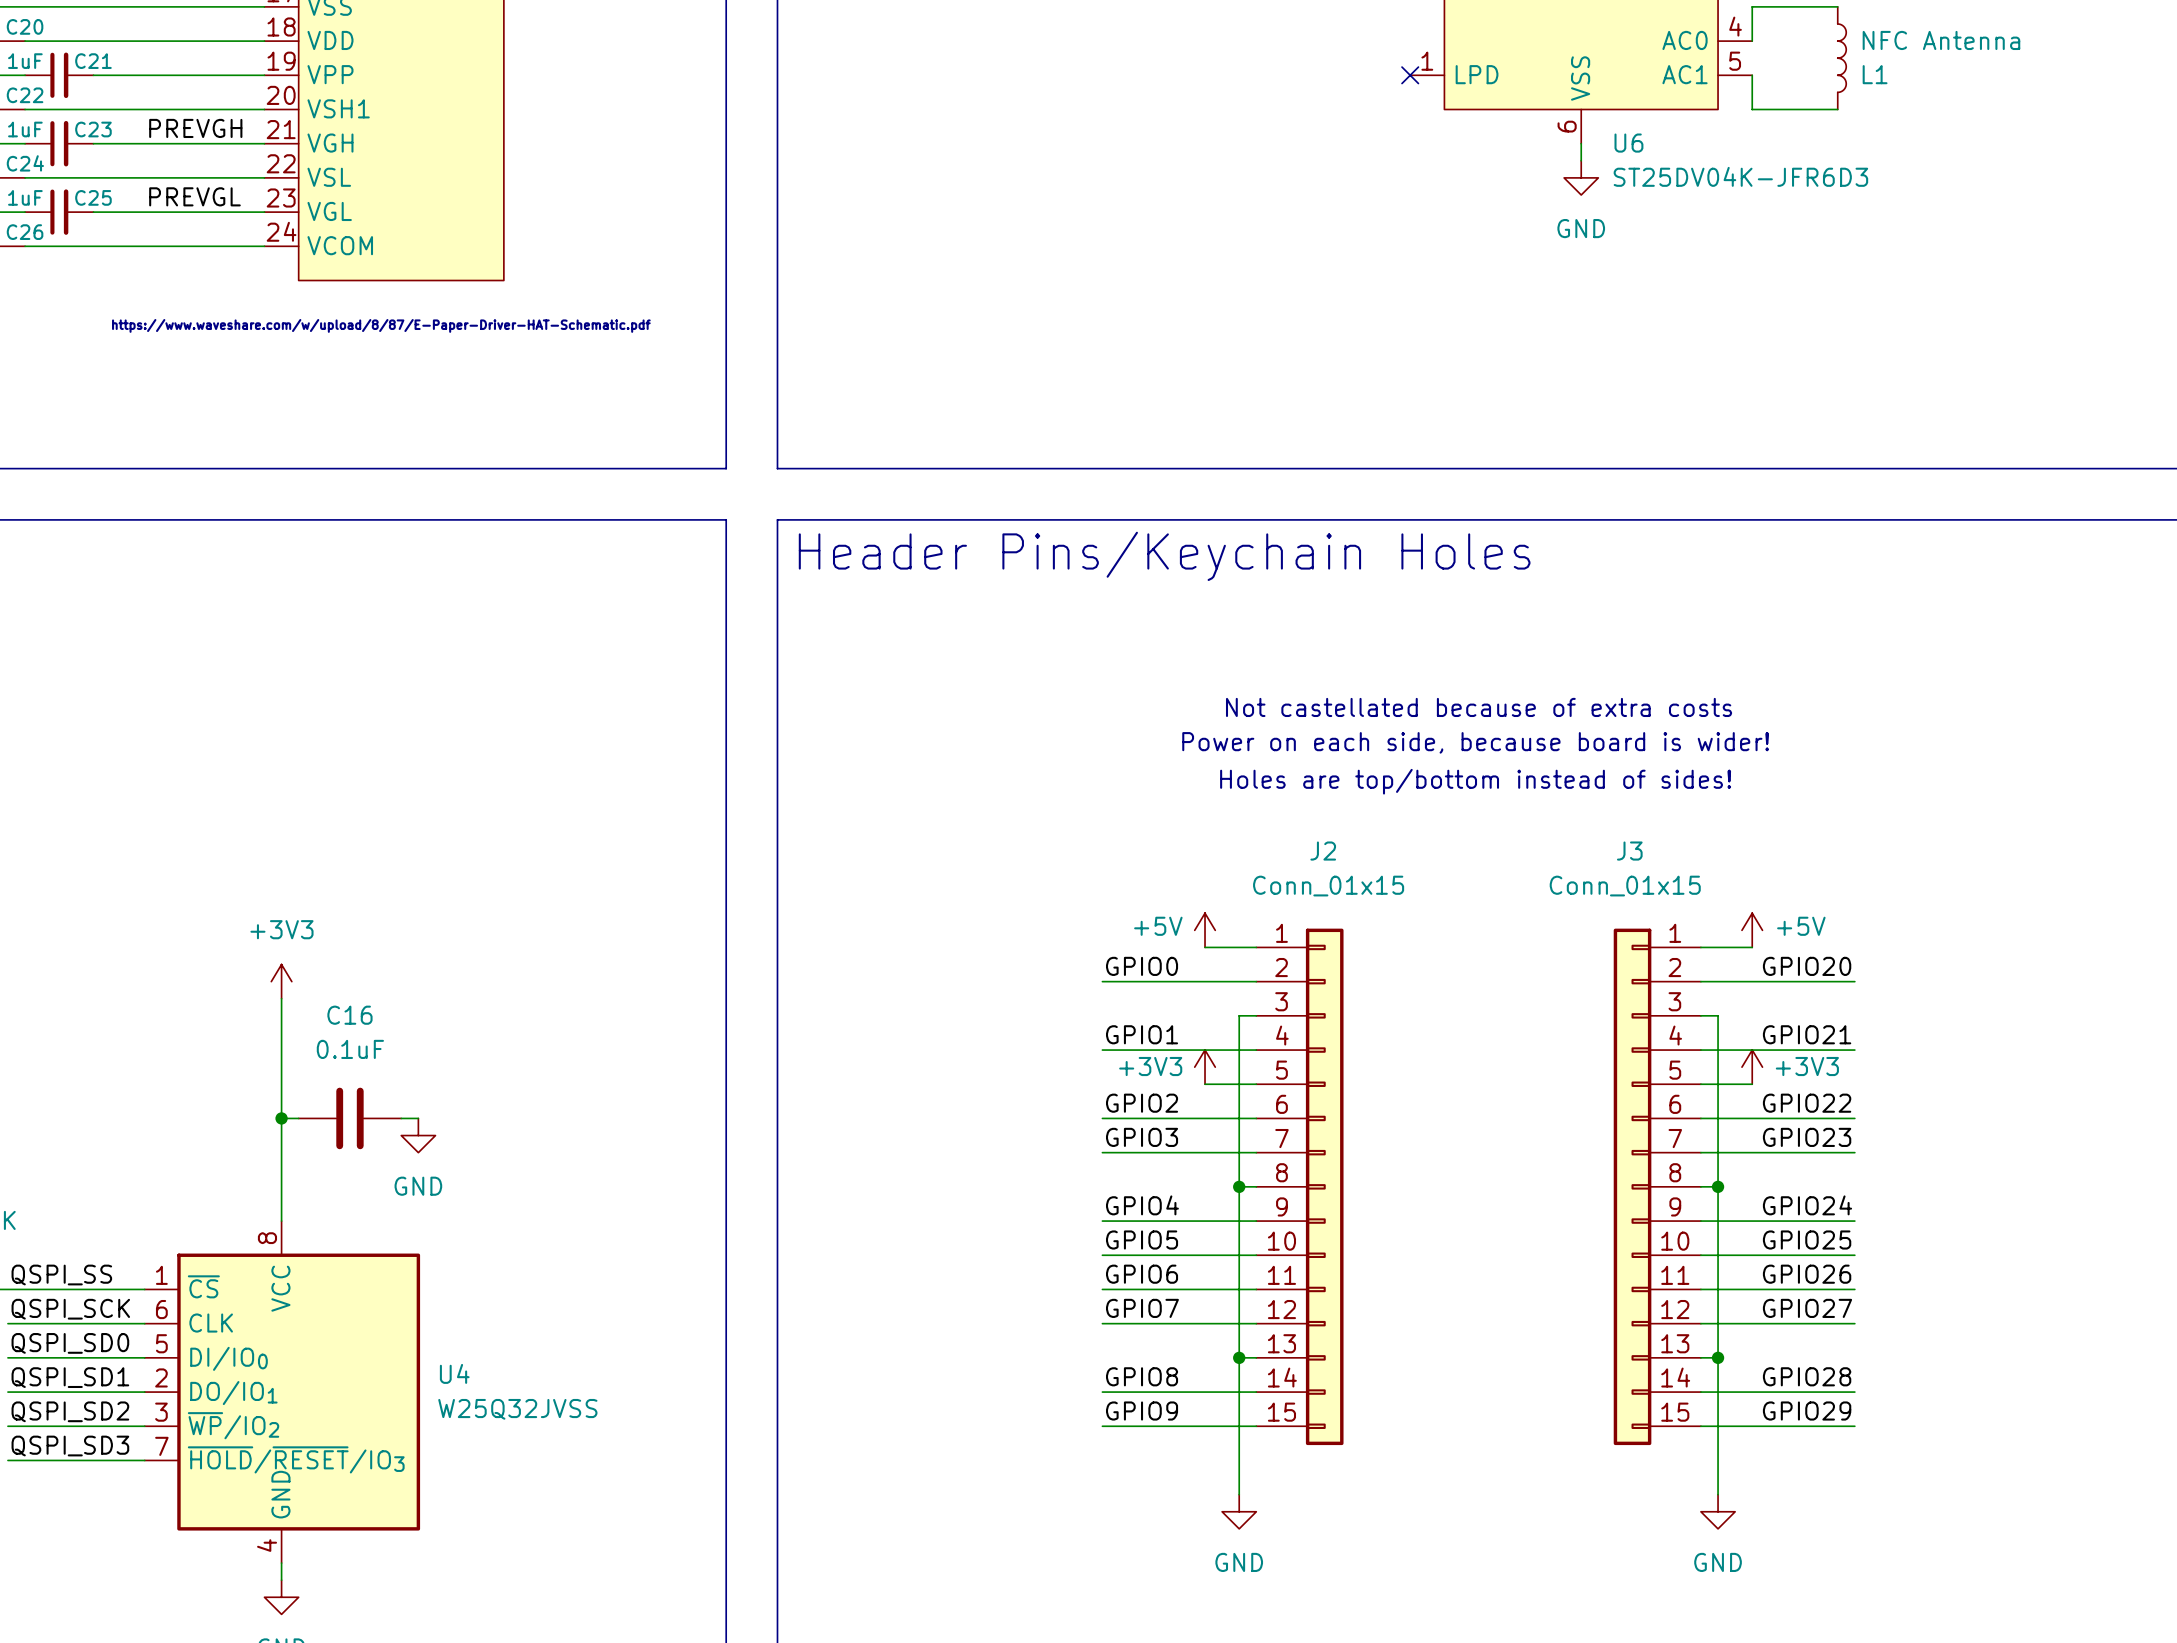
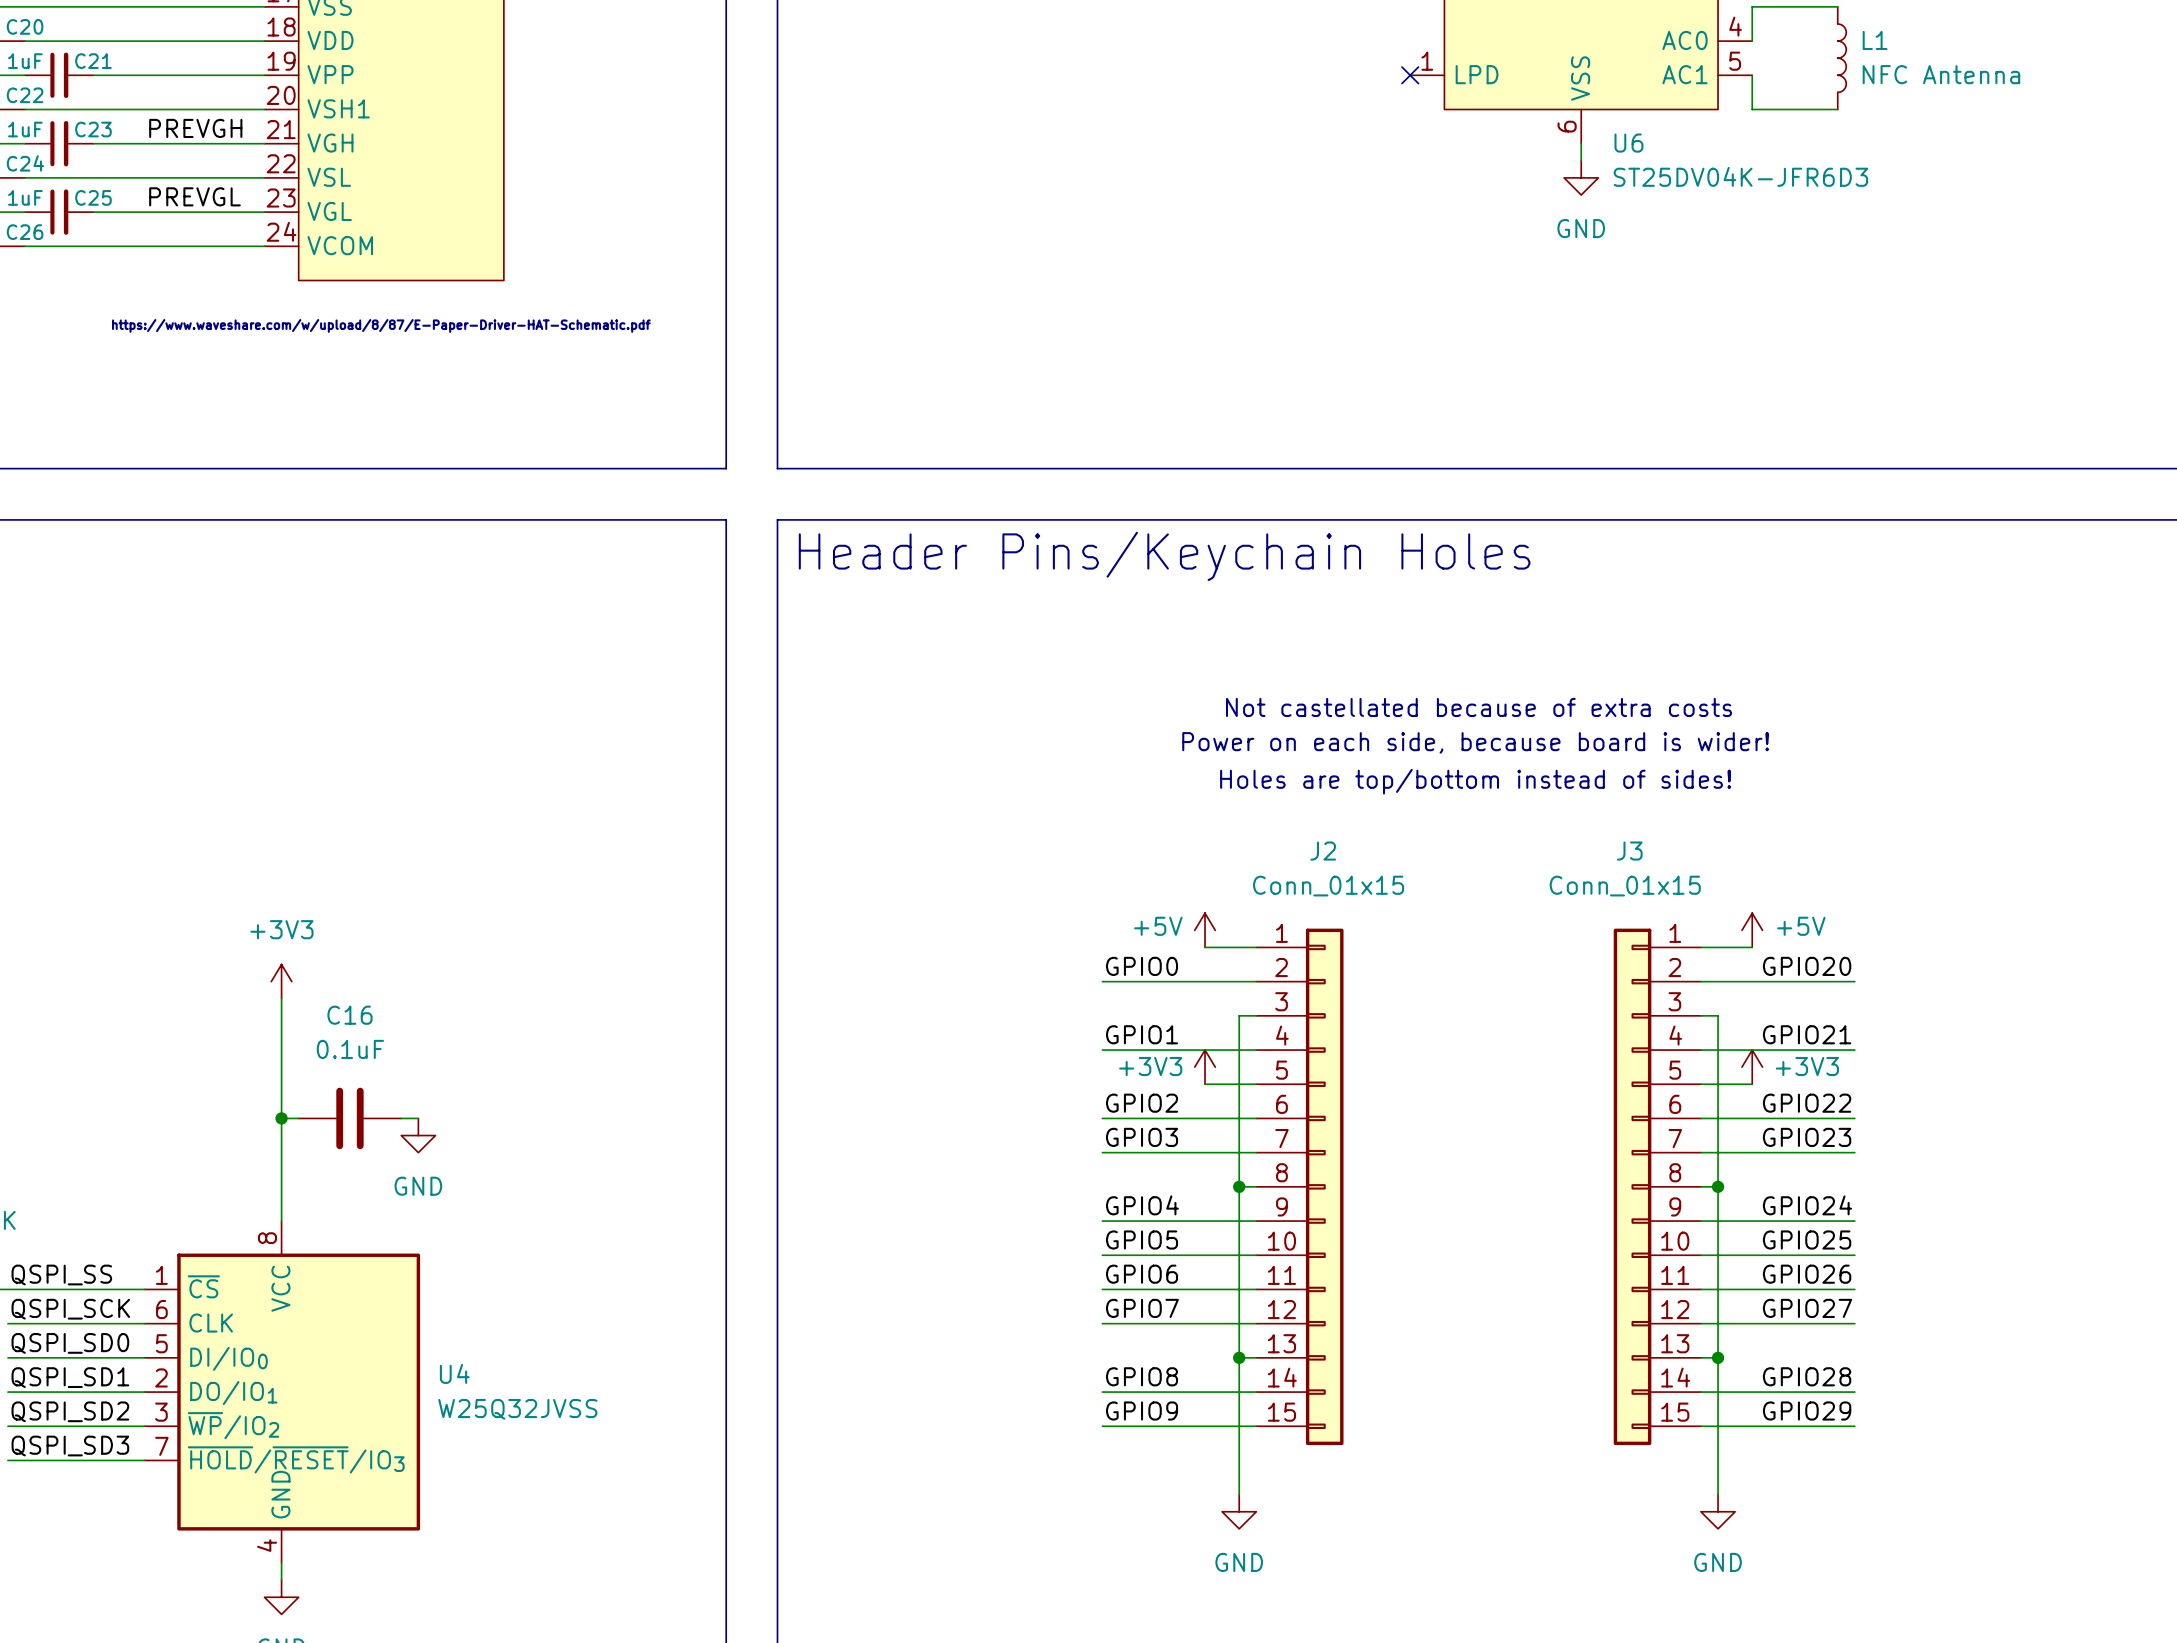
L1 value position: NFC Antenna (1941, 40) -> NFC Antenna (1941, 74)
L1 name position: L1 (1875, 74) -> L1 (1875, 40)

